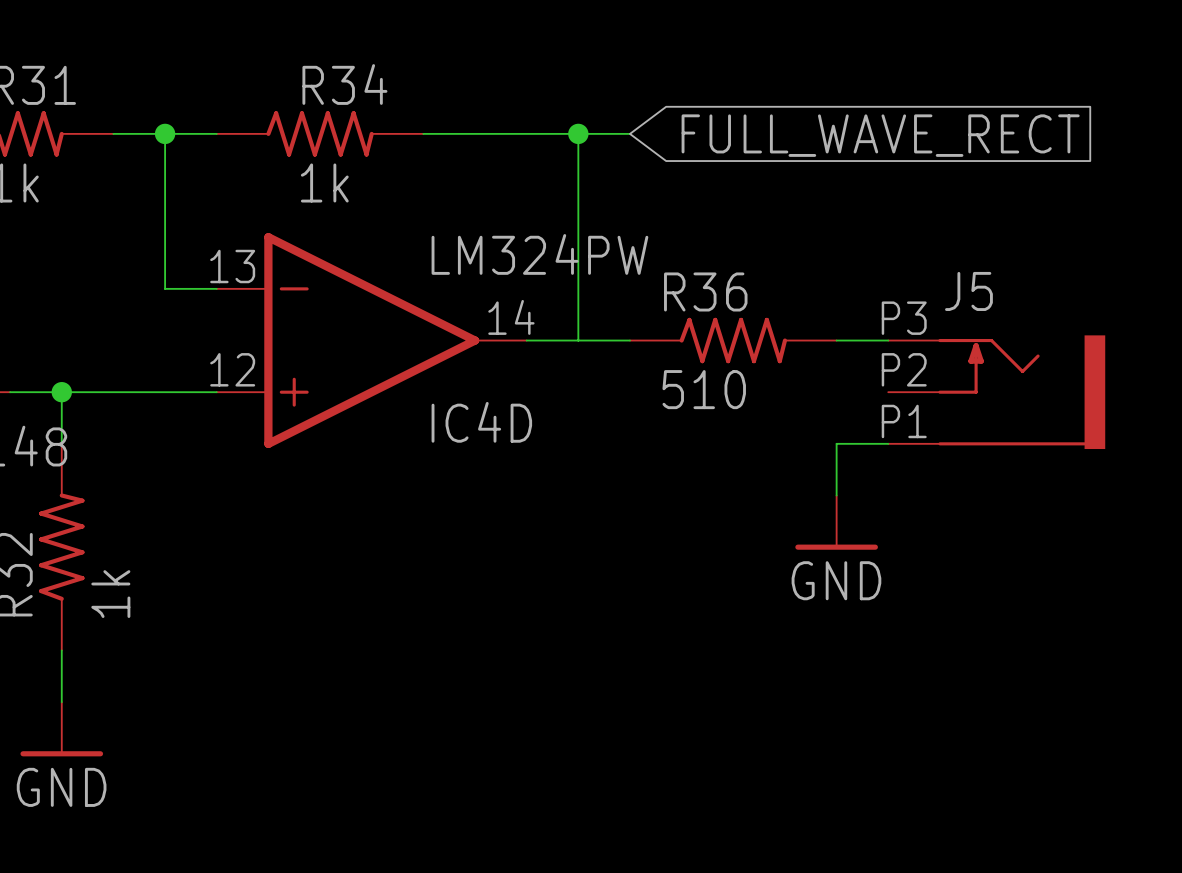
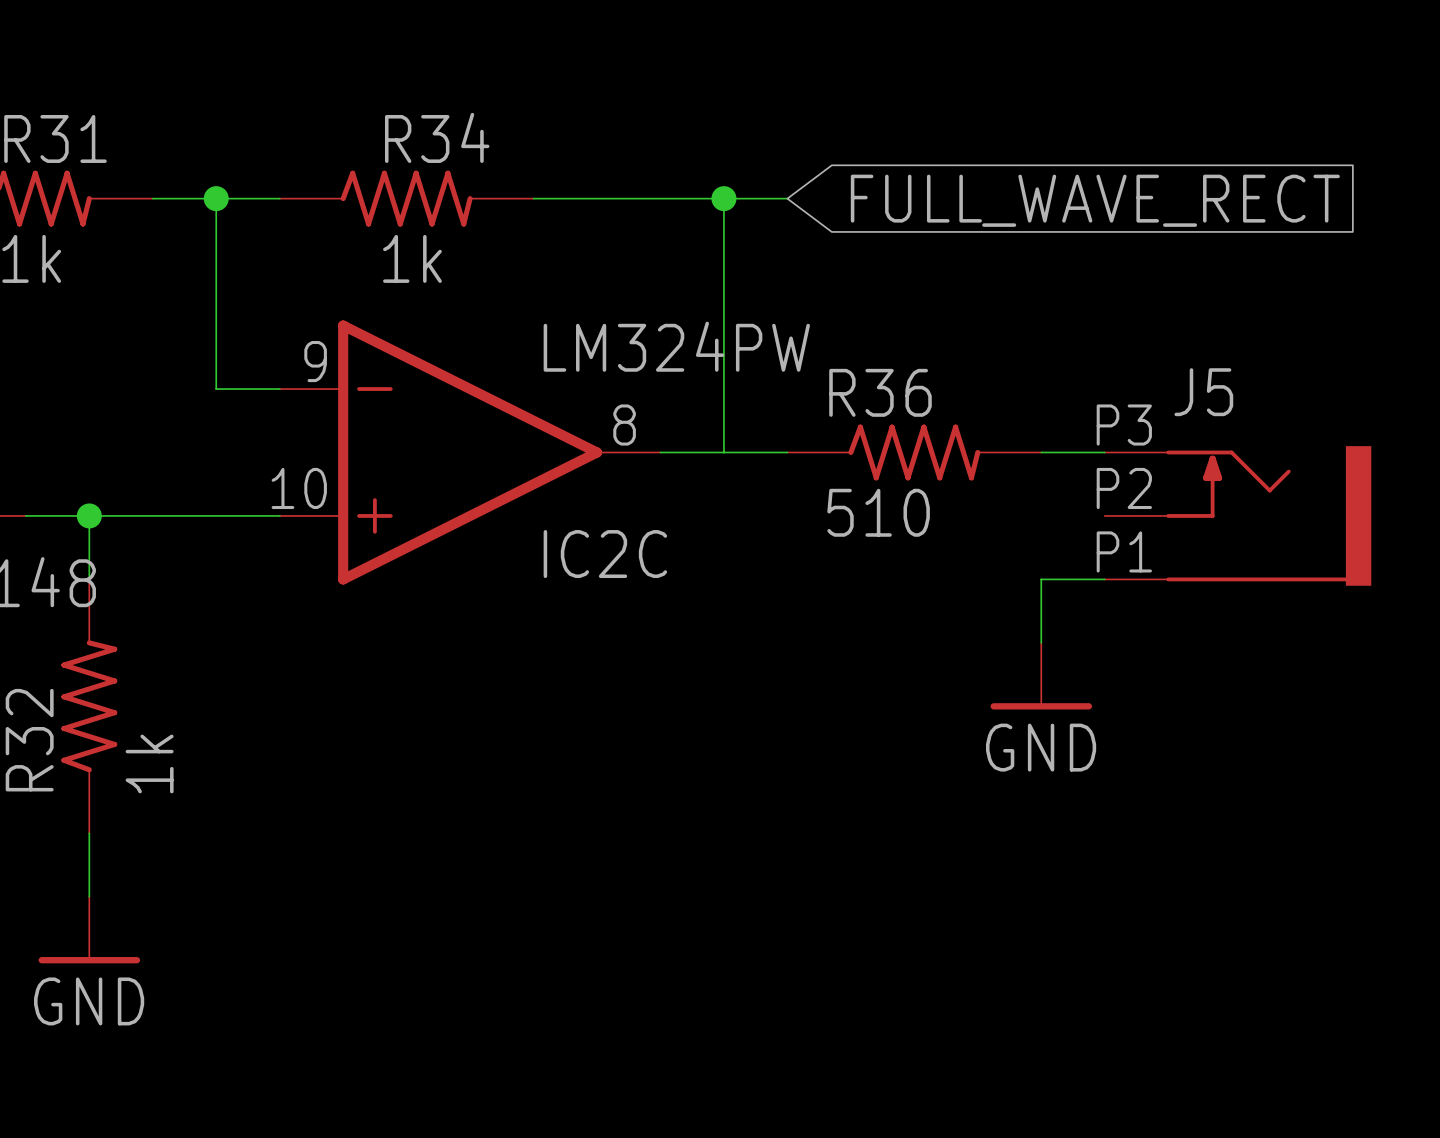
IC4D pin number: 13 (232, 266) -> 9 (315, 361)
IC4D pin number: 14 (511, 317) -> 8 (624, 425)
IC4D pin number: 12 (232, 369) -> 10 (299, 488)
IC4D name: IC4D (481, 422) -> IC2C (605, 554)

